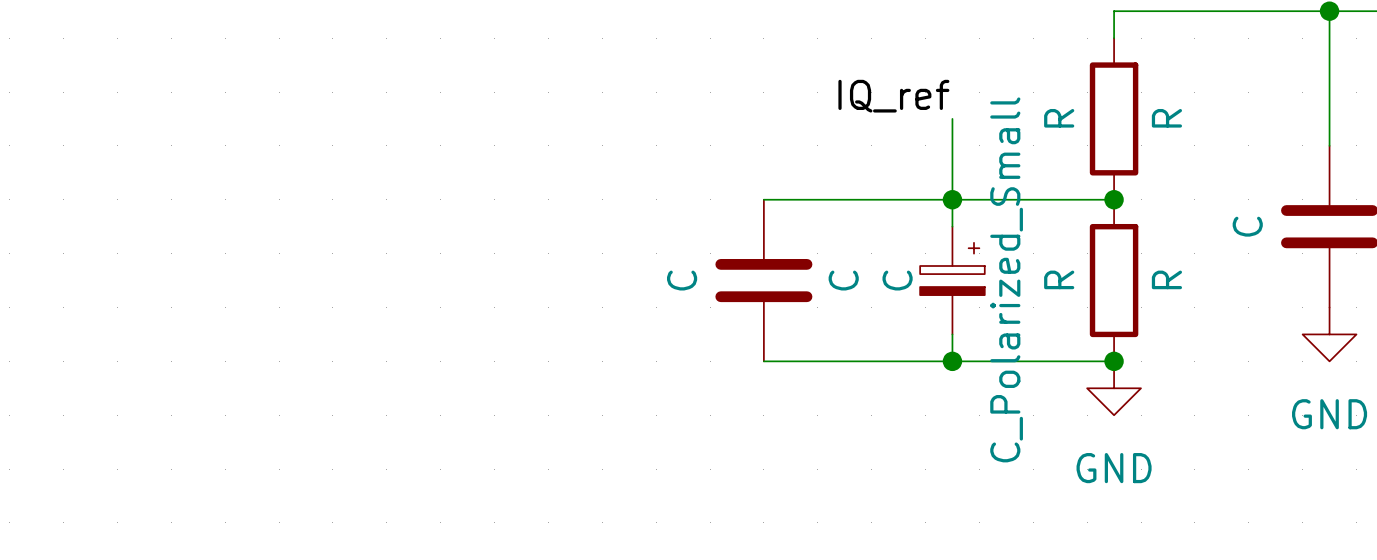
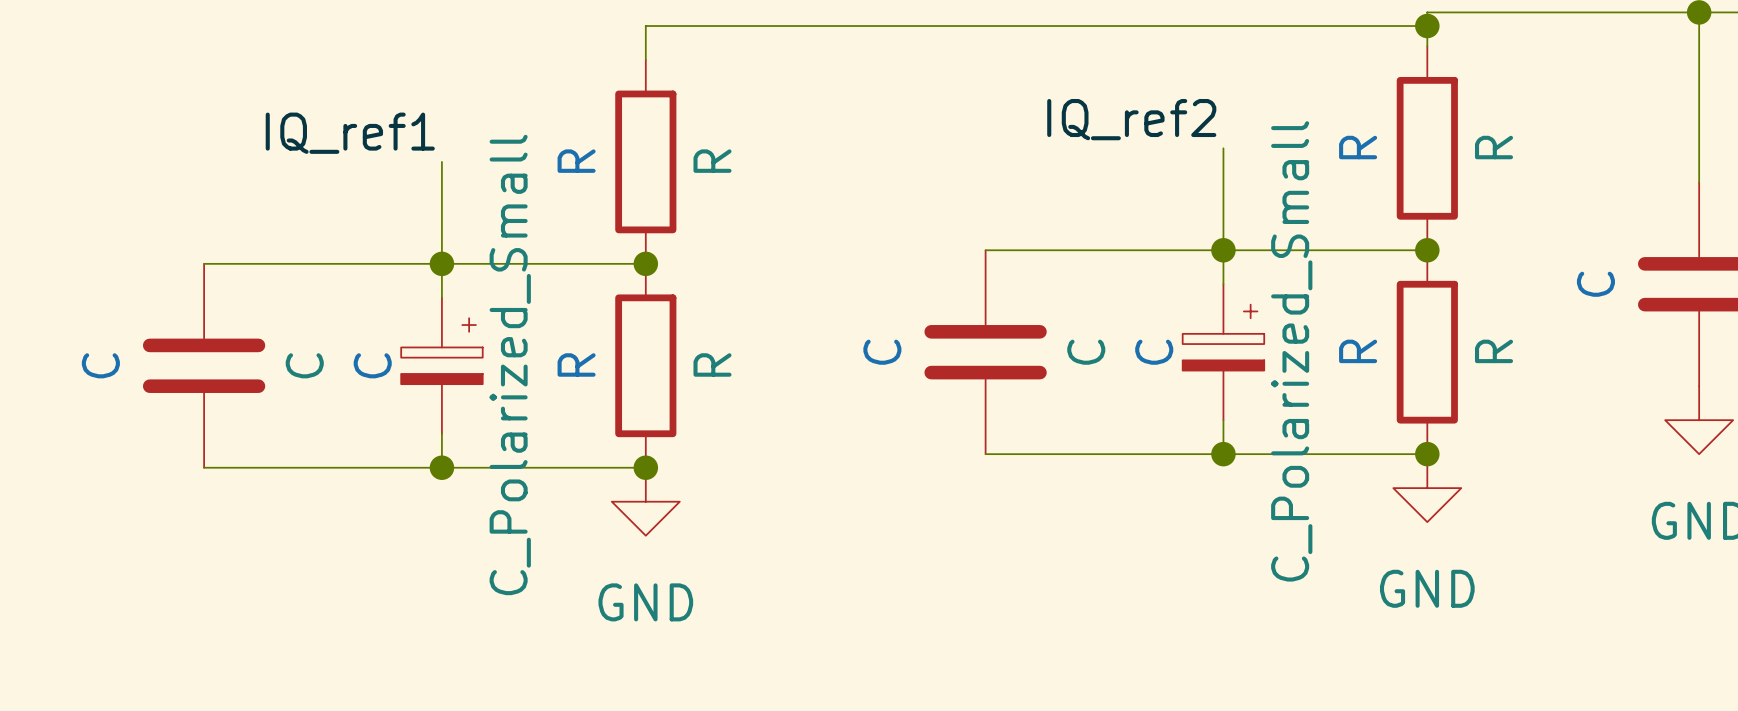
wire: none -> (1427, 26) (645, 26) (645, 59)
junction: none -> (1427, 26)
label: IQ_ref (893, 96) -> IQ_ref2 (1131, 119)
label: none -> IQ_ref1 (350, 133)
wire: none -> (441, 161) (441, 297)
R: none -> R (645, 161)
wire: none -> (204, 263) (645, 263)
junction: none -> (441, 263)
junction: none -> (645, 263)
C: none -> C (204, 365)
C: none -> C_Polarized_Small (441, 365)
R: none -> R (645, 365)
wire: none -> (441, 433) (441, 467)
wire: none -> (204, 467) (645, 467)
junction: none -> (441, 467)
junction: none -> (645, 467)
power symbol: none -> GND (645, 501)

